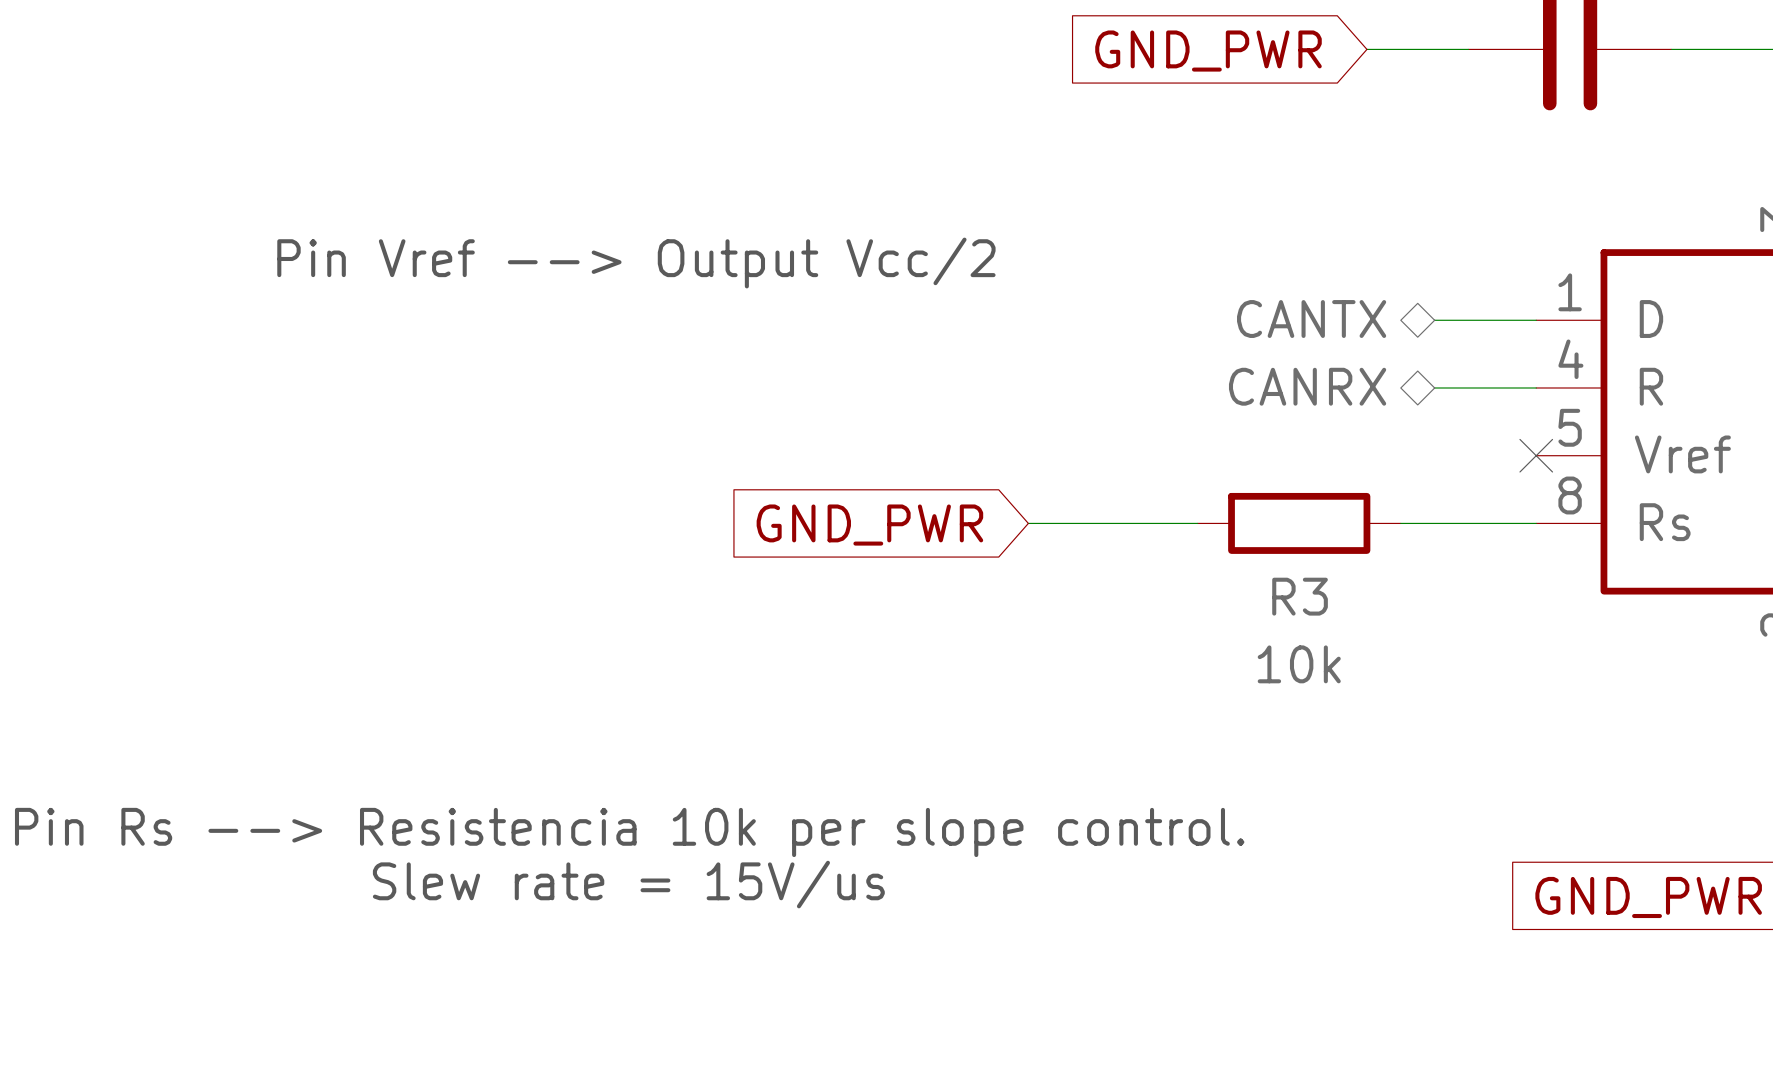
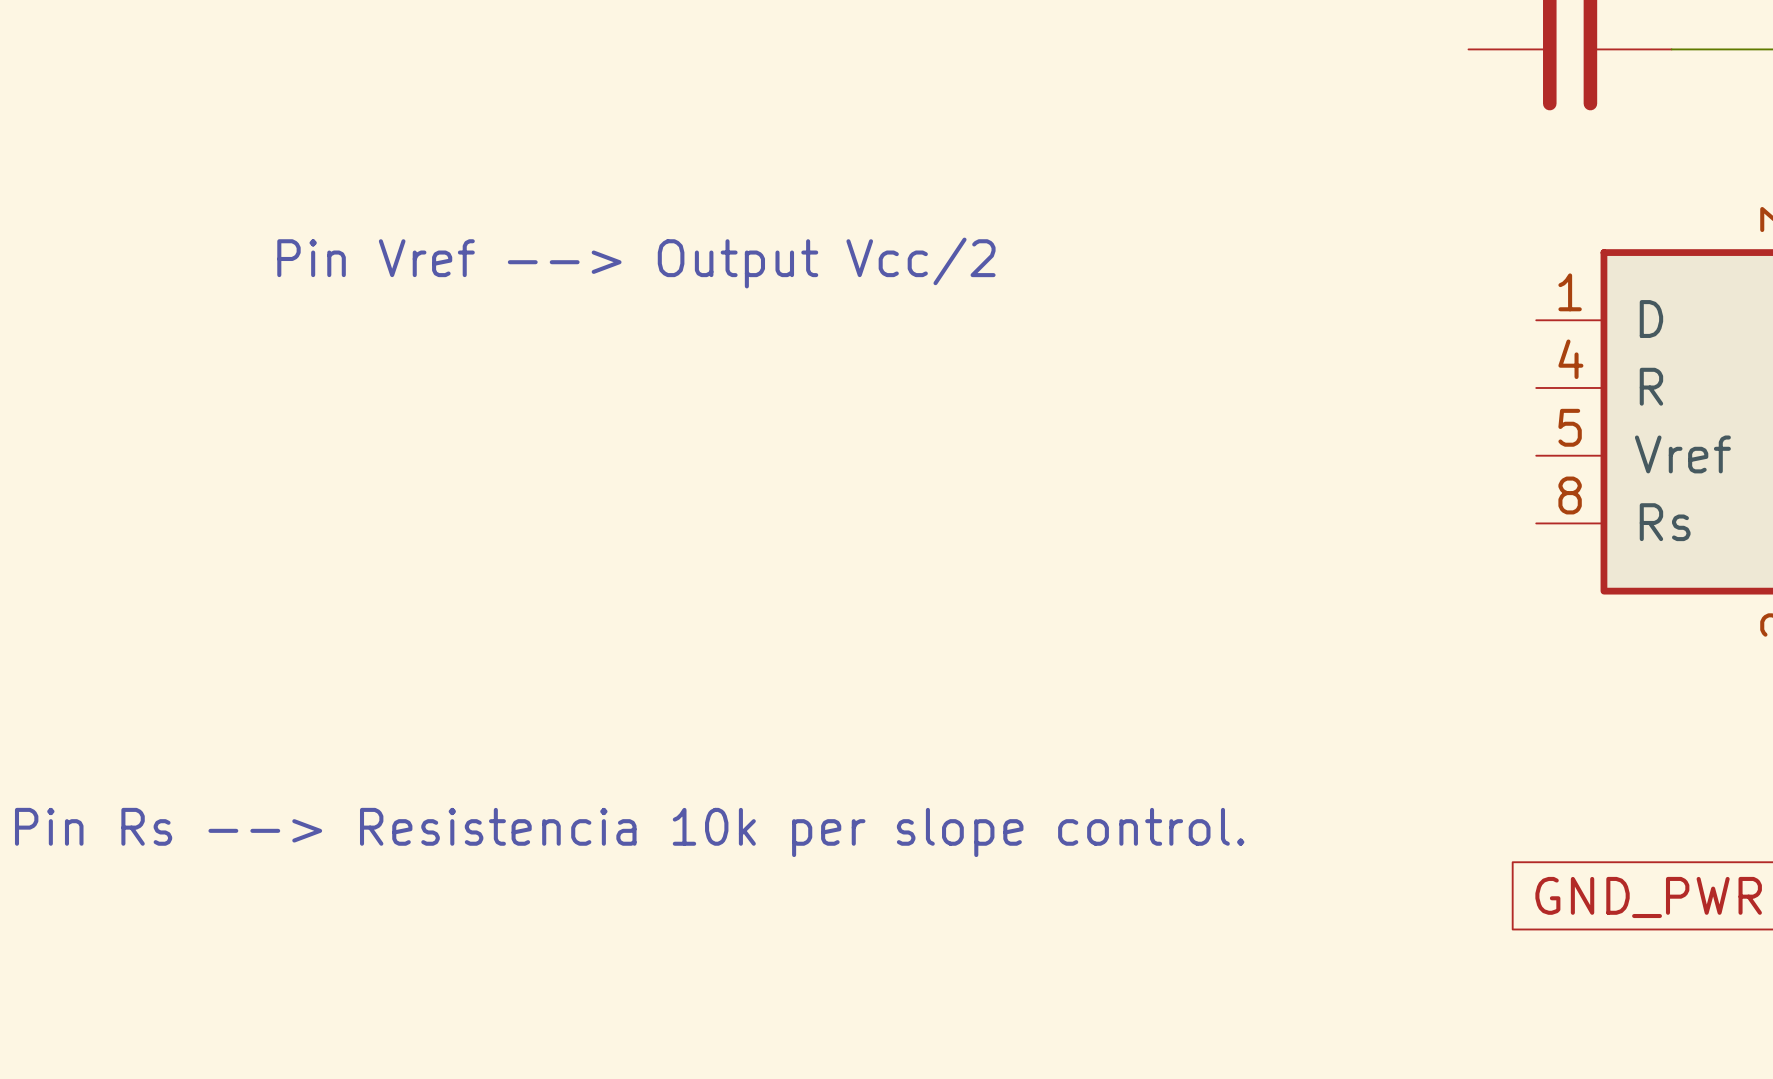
wire: (1366, 49) (1468, 49) -> none
global label: GND_PWR (1208, 51) -> none
hierarchical label: CANTX (1311, 319) -> none
wire: (1434, 320) (1536, 320) -> none
hierarchical label: CANRX (1307, 386) -> none
wire: (1434, 387) (1536, 387) -> none
no-connect mark: (1536, 455) -> none
wire: (1028, 523) (1197, 523) -> none
R3: 10k (1299, 523) -> none
wire: (1400, 523) (1536, 523) -> none
global label: GND_PWR (869, 525) -> none
text: Slew rate = 15V/us (628, 884) -> none

